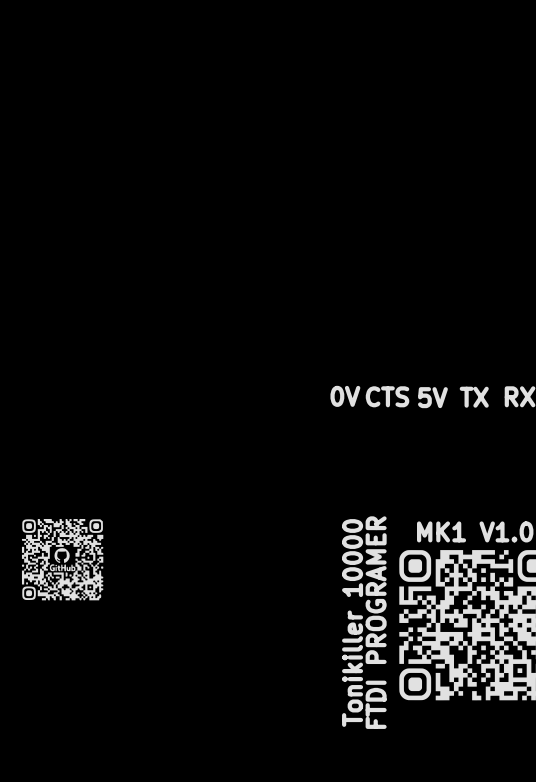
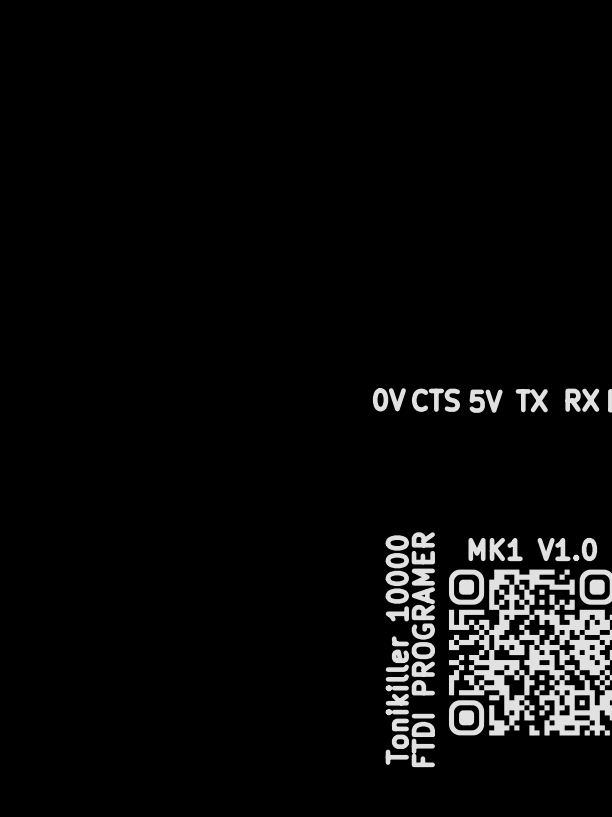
drawing: [21, 518, 104, 601] -> none

